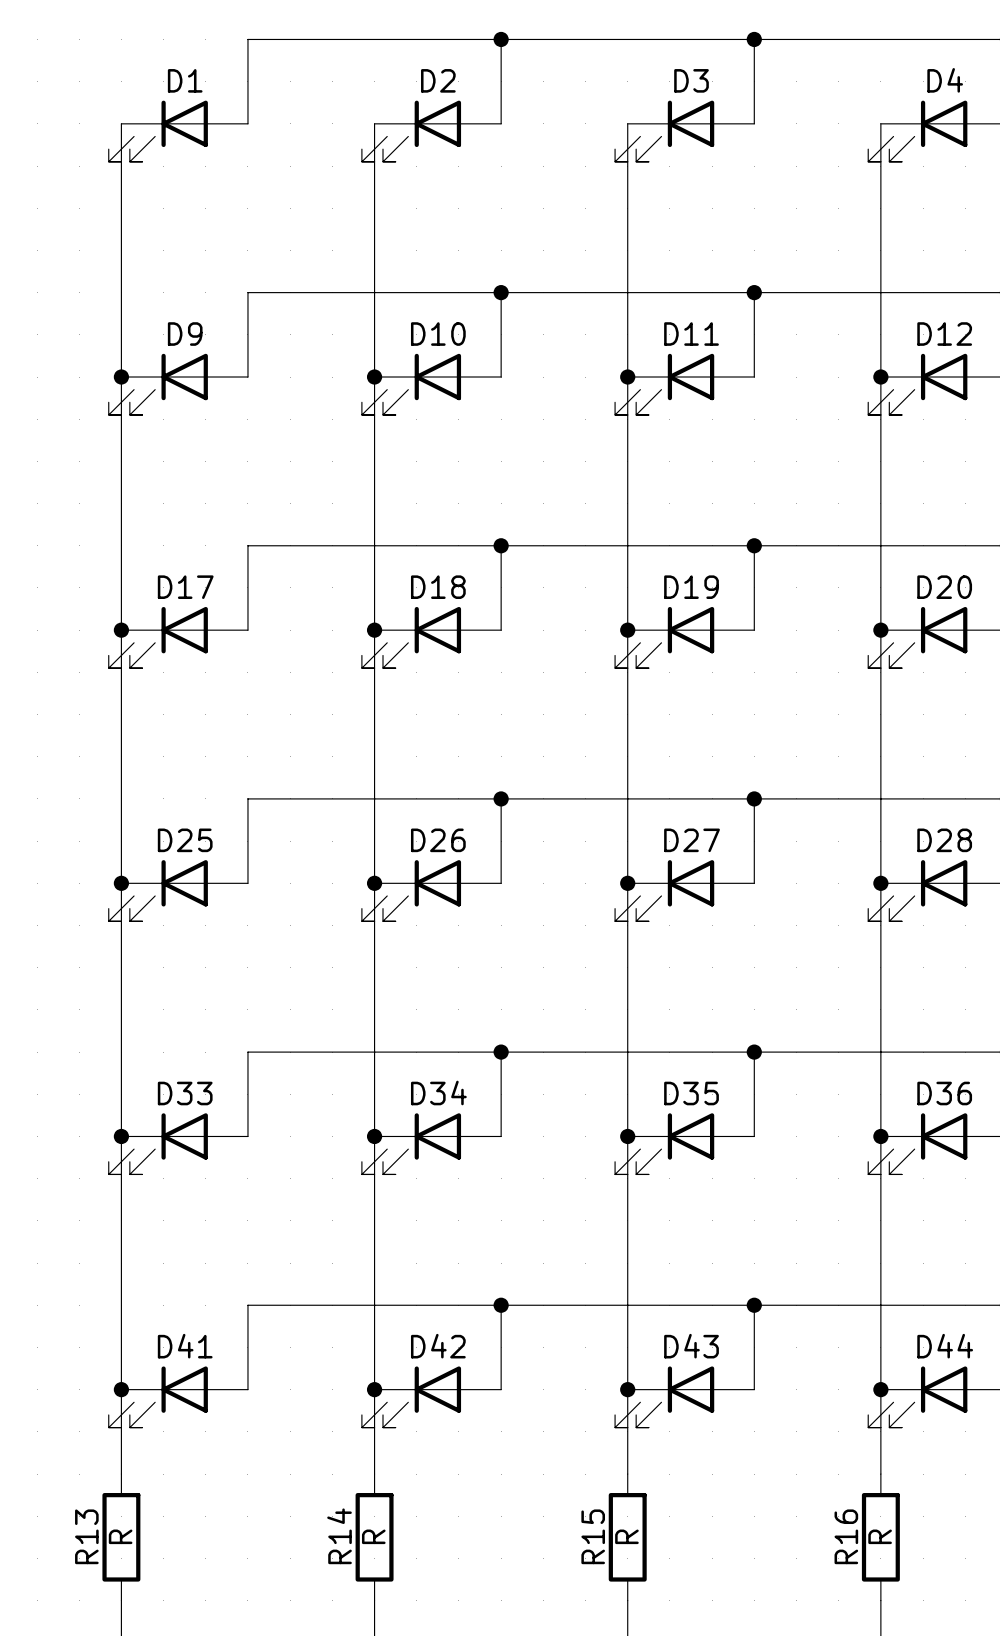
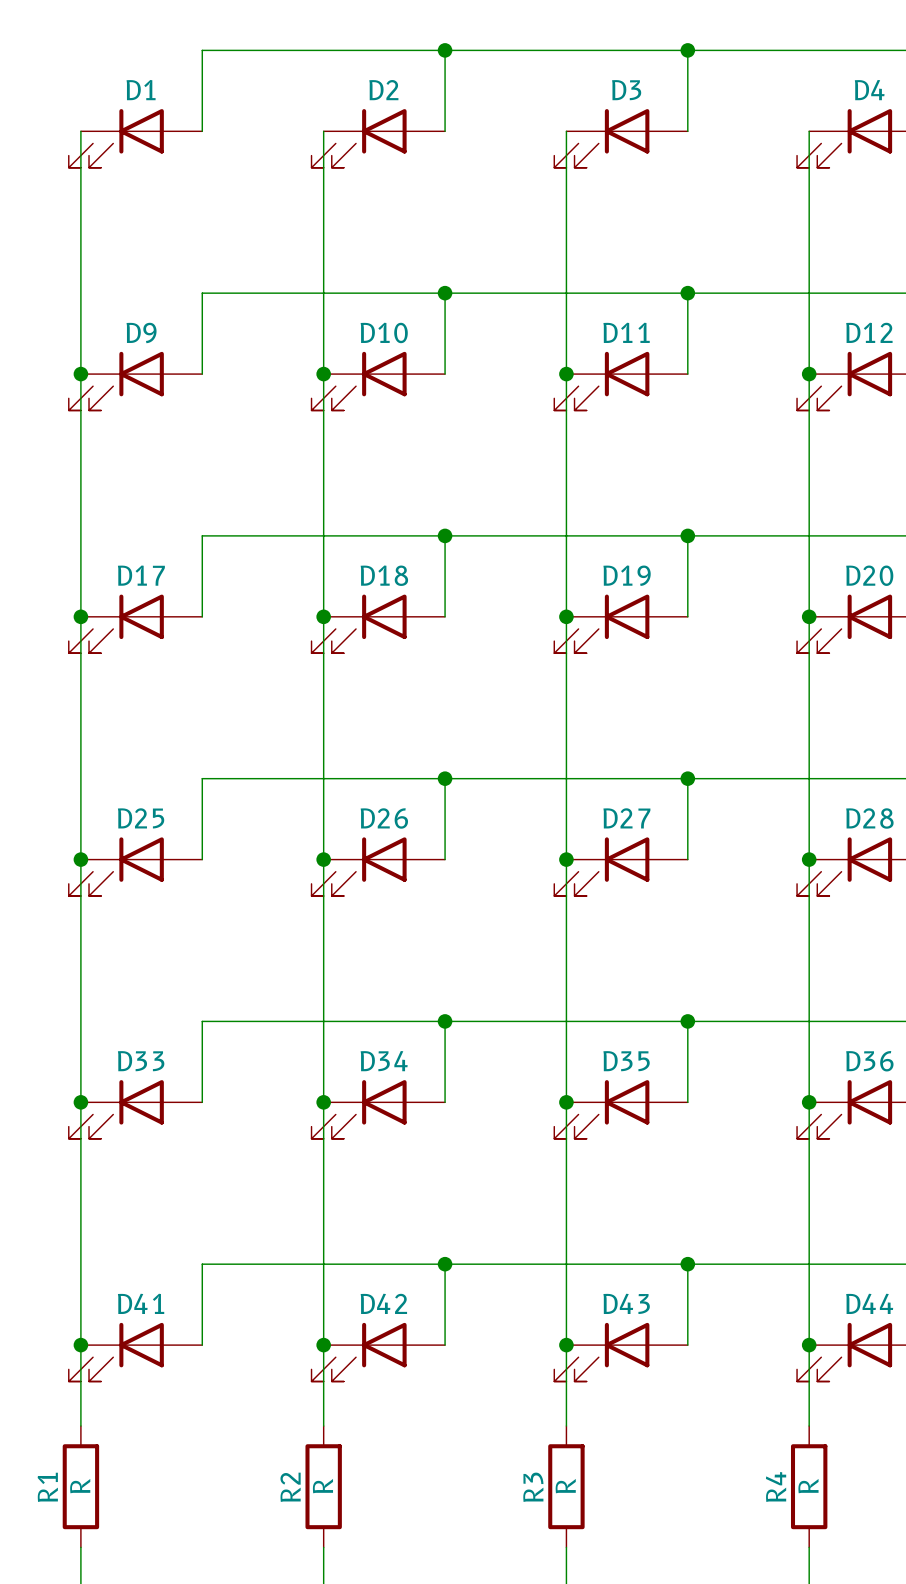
R13 name: R13 (86, 1536) -> R1 (47, 1487)
R14 name: R14 (339, 1536) -> R2 (290, 1487)
R15 name: R15 (593, 1536) -> R3 (533, 1487)
R16 name: R16 (846, 1536) -> R4 (776, 1487)

